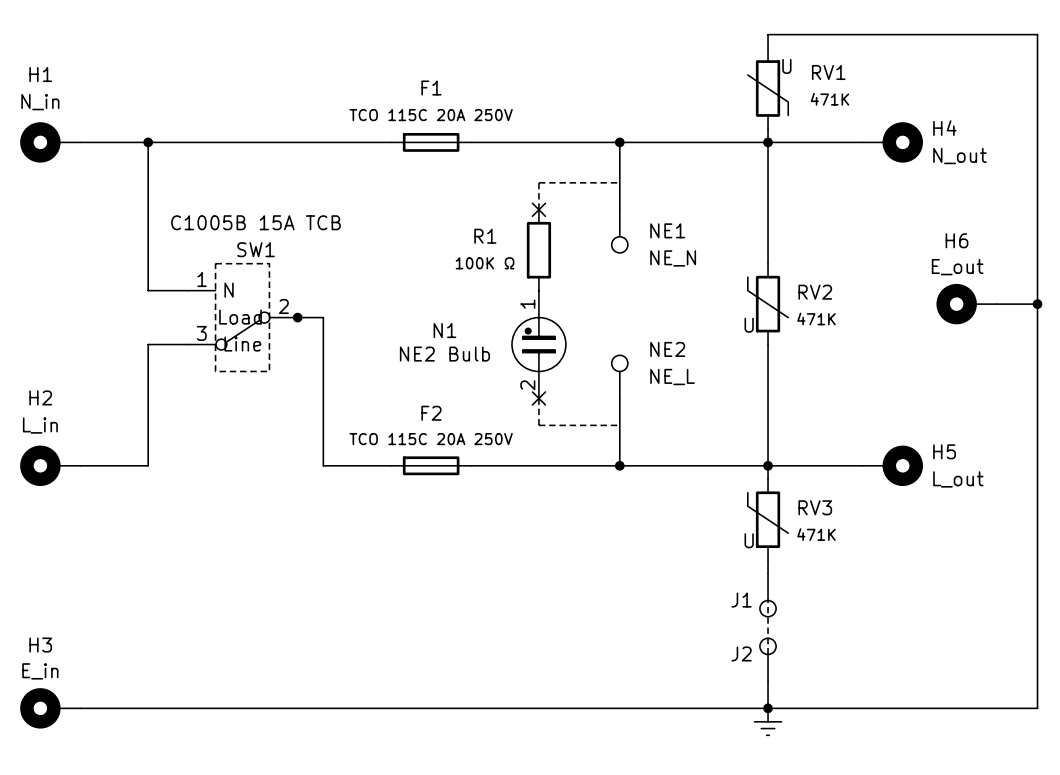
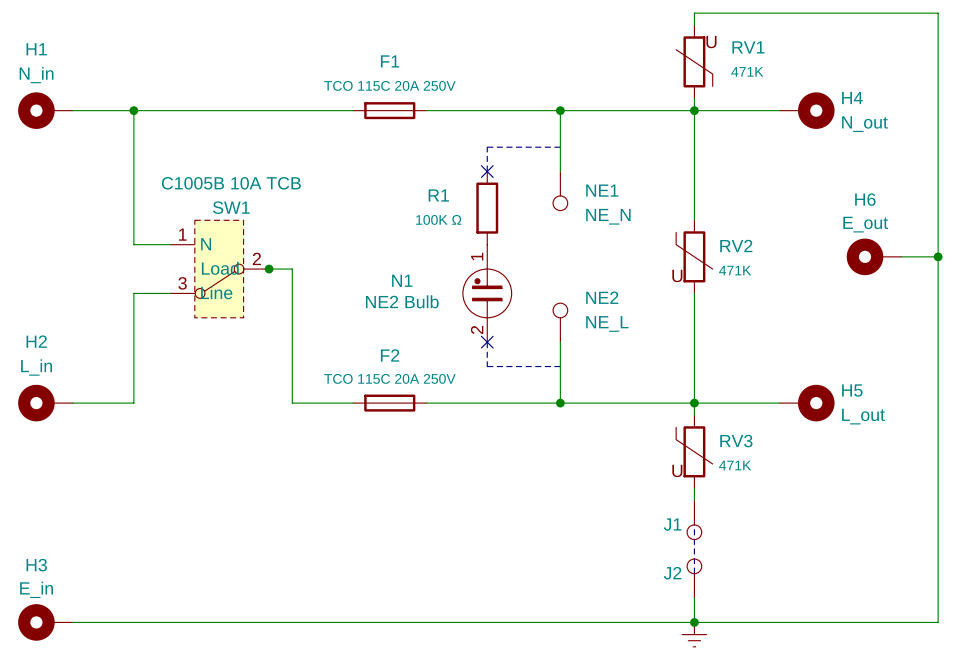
SW1 value: C1005B 15A TCB (255, 222) -> C1005B 10A TCB (231, 183)

